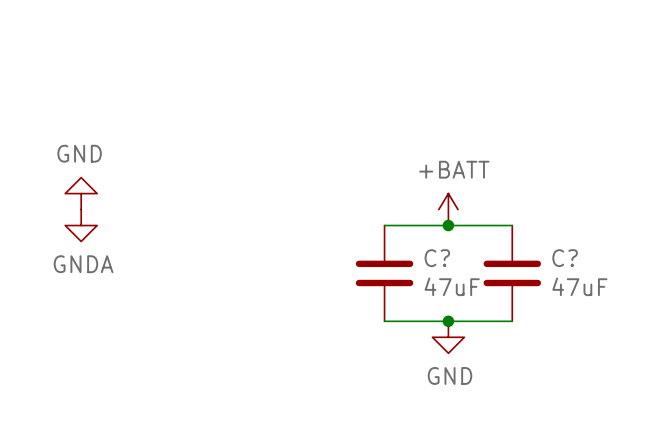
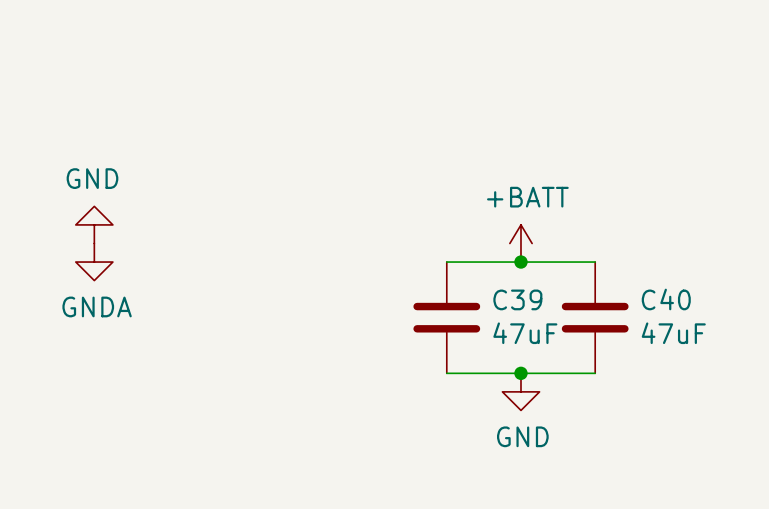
C? name: C? (437, 258) -> C39 (517, 299)
C? name: C? (565, 258) -> C40 (666, 299)

